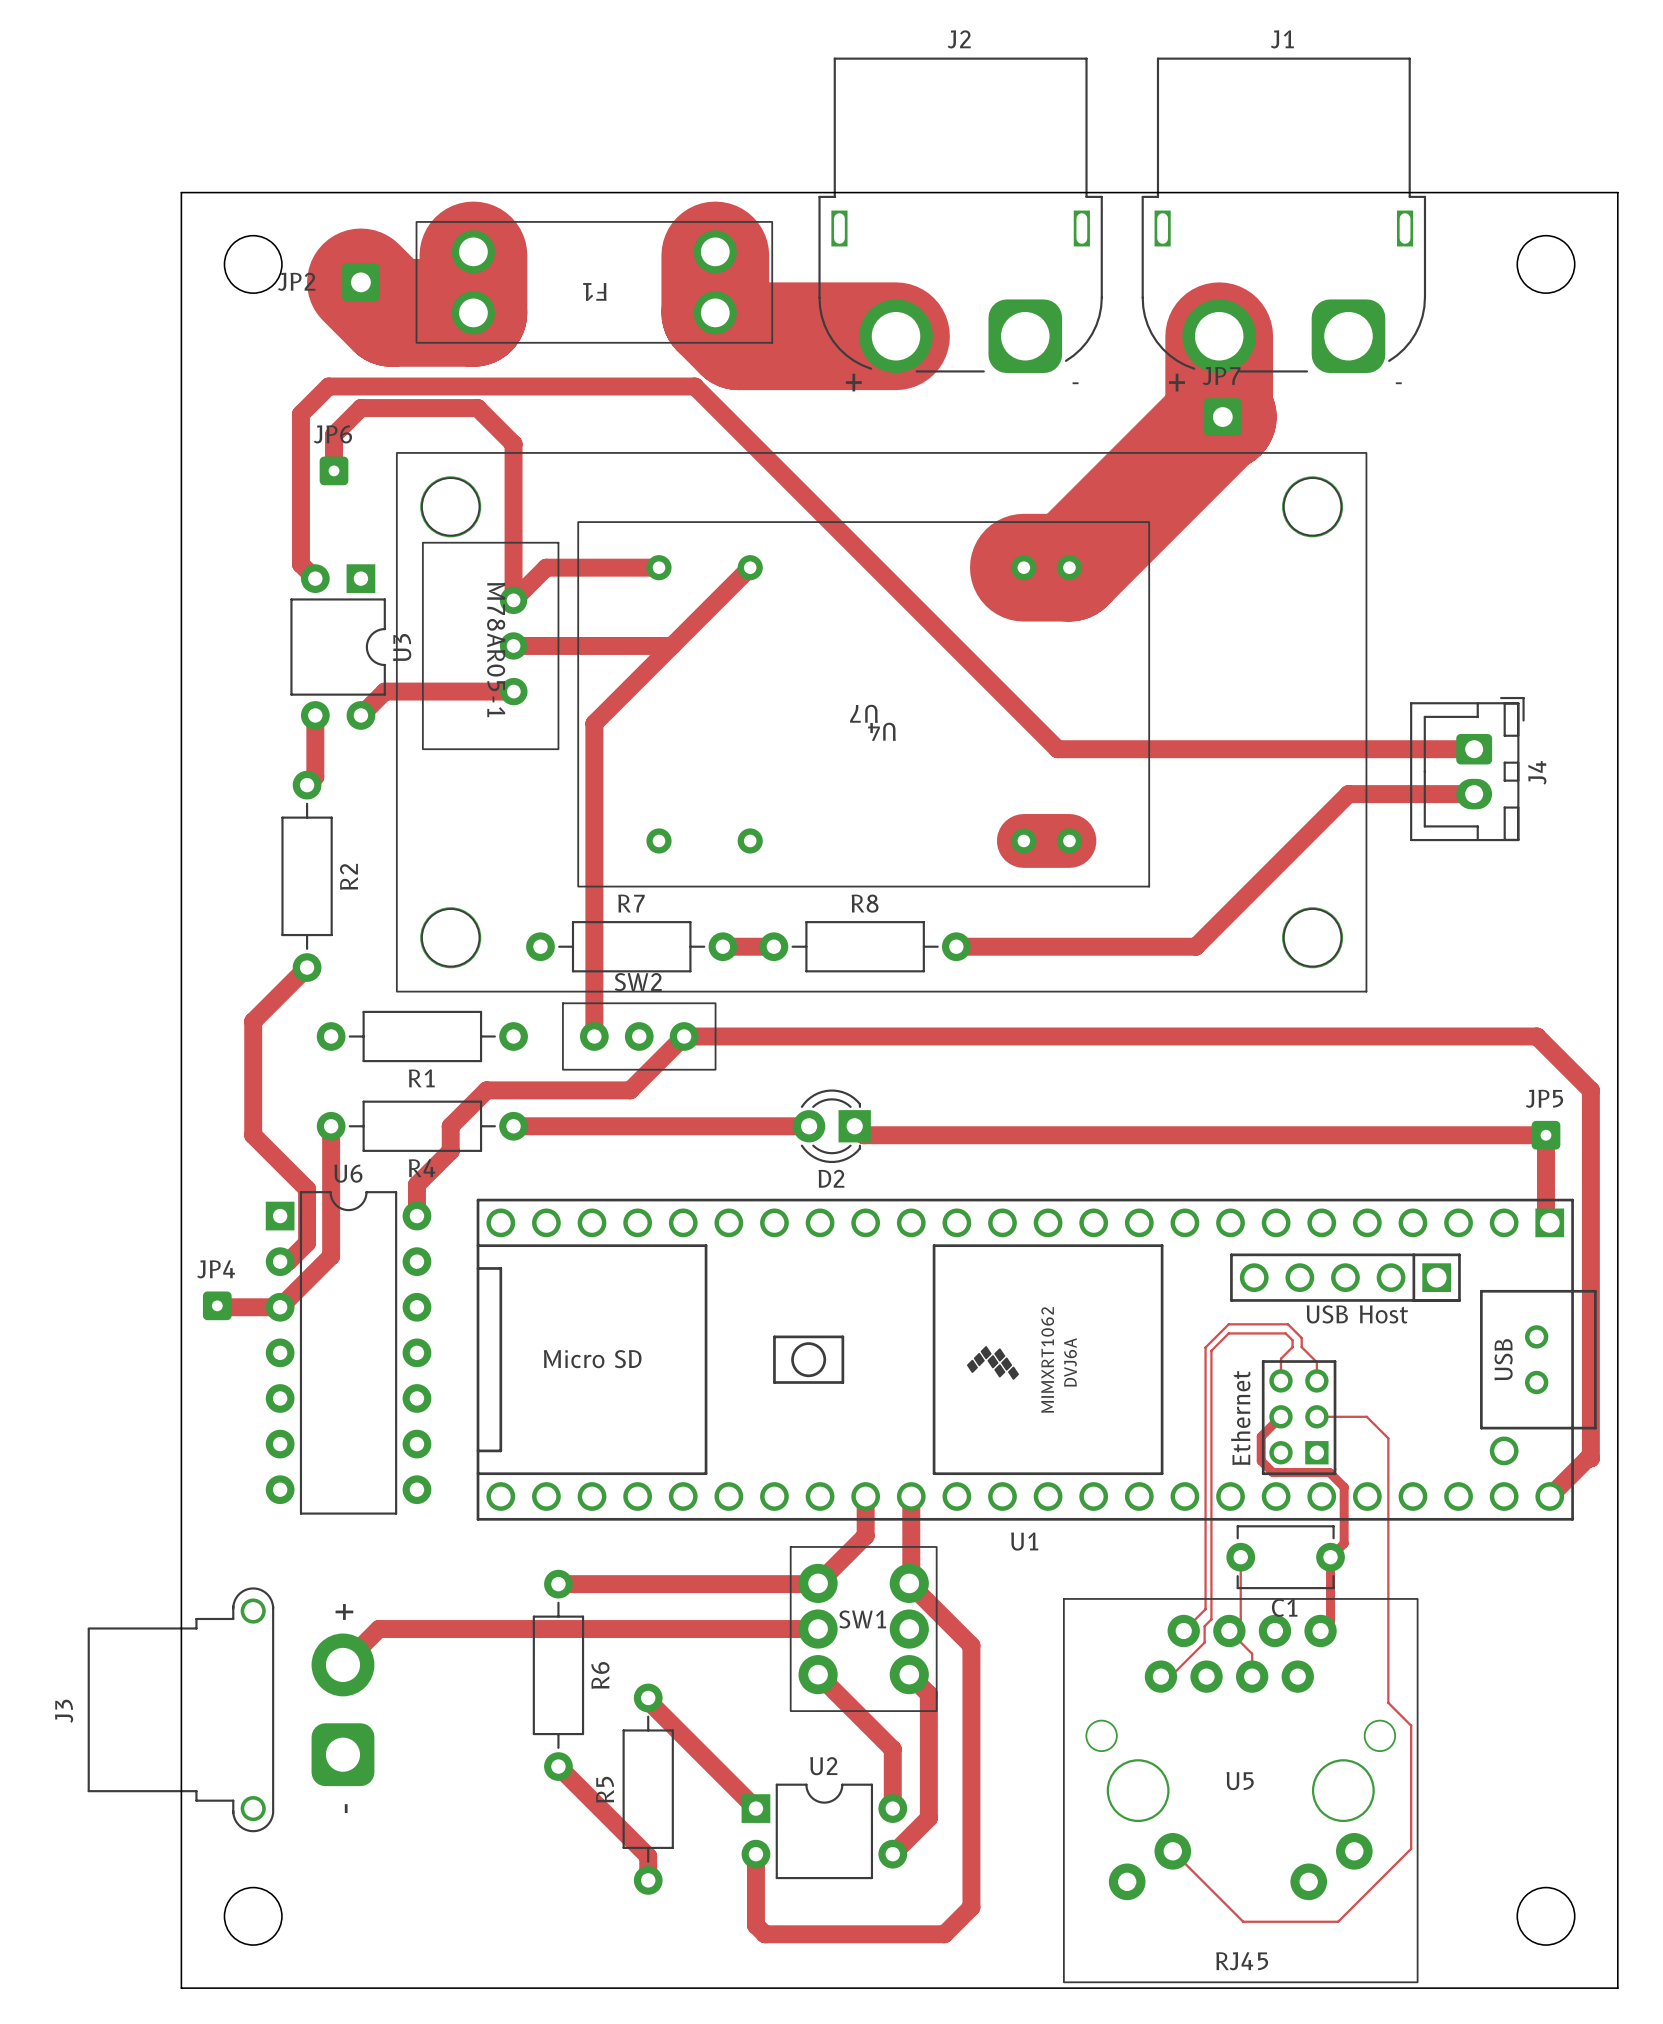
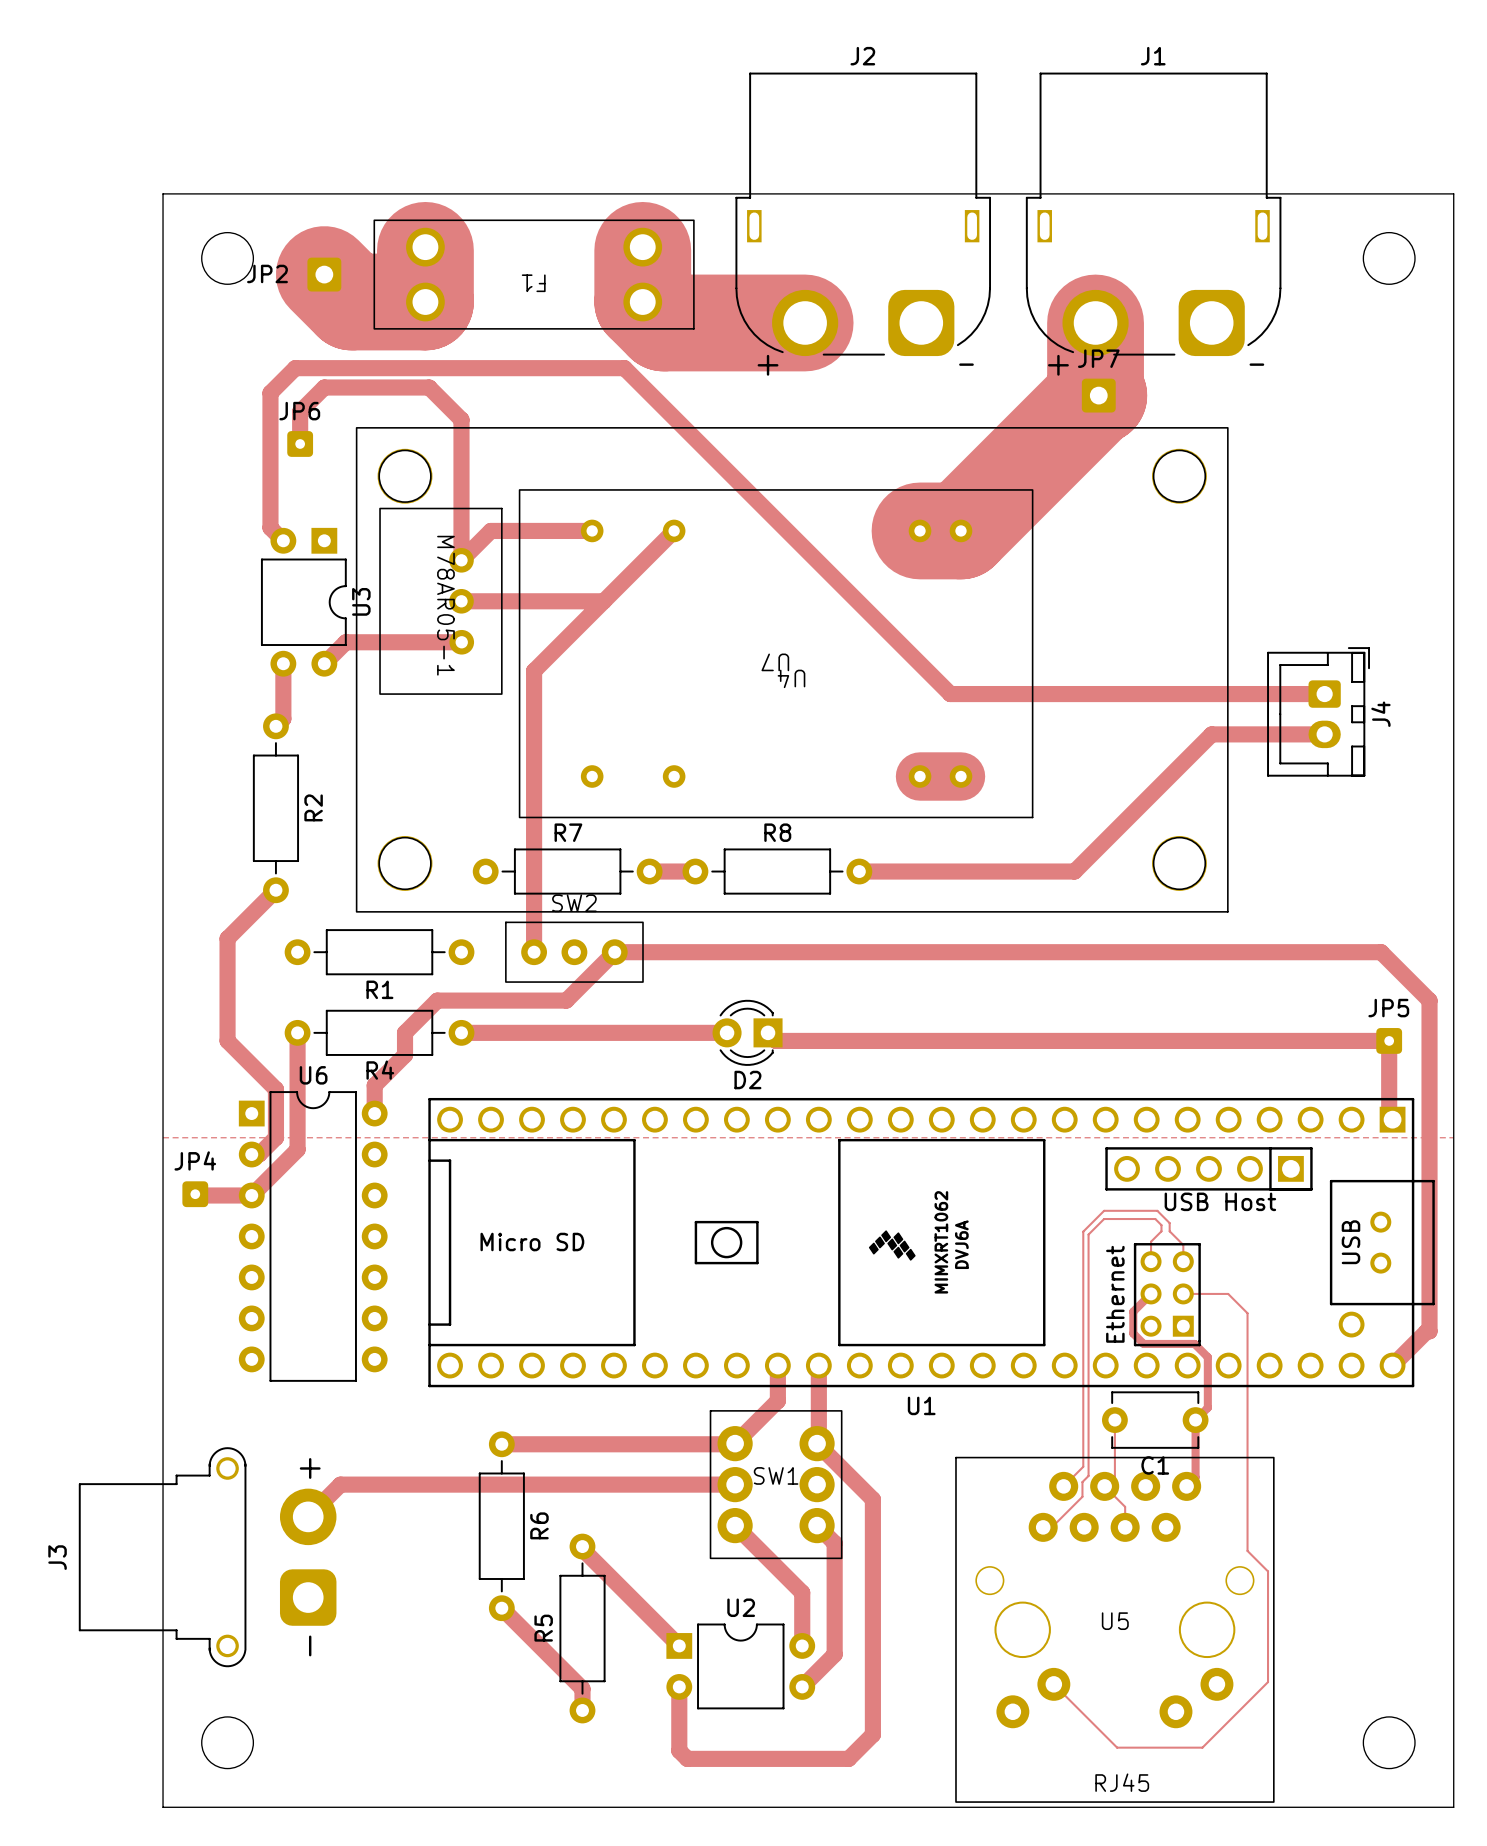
zone outline: none -> (163, 1137) (1453, 1137)

